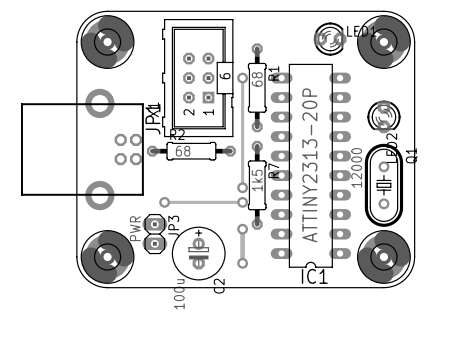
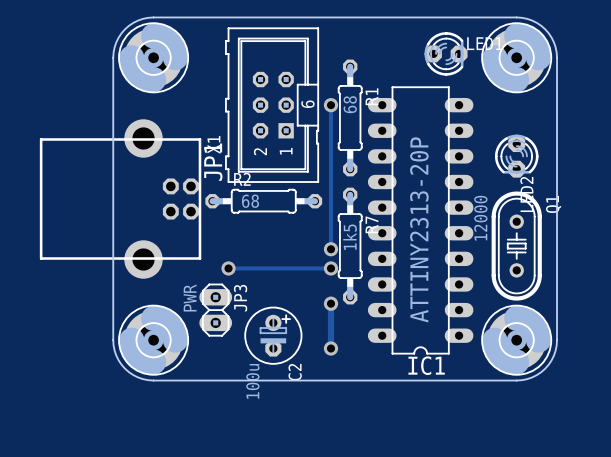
C2 footprint: [171, 226, 226, 281] -> [244, 306, 303, 365]

